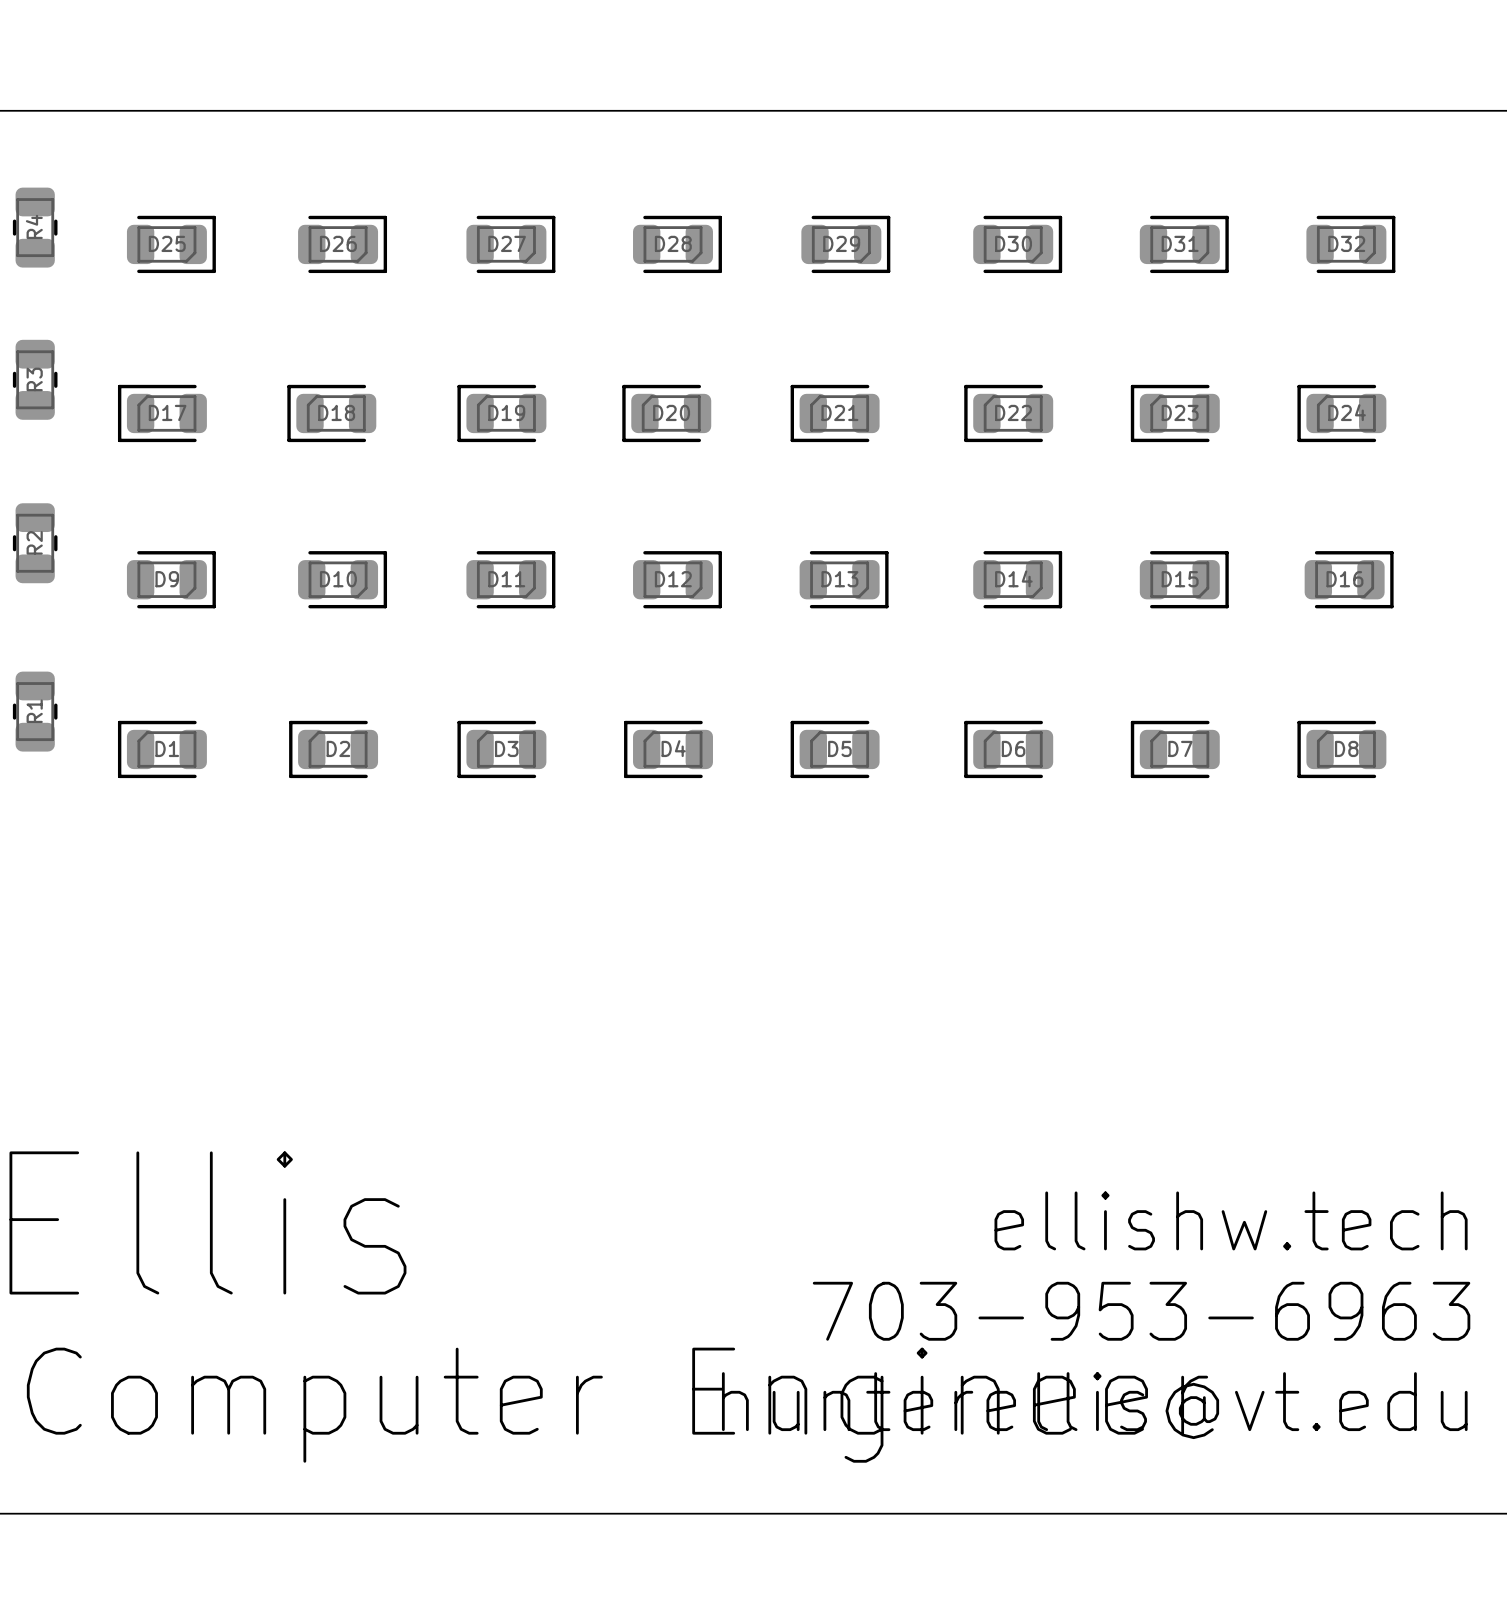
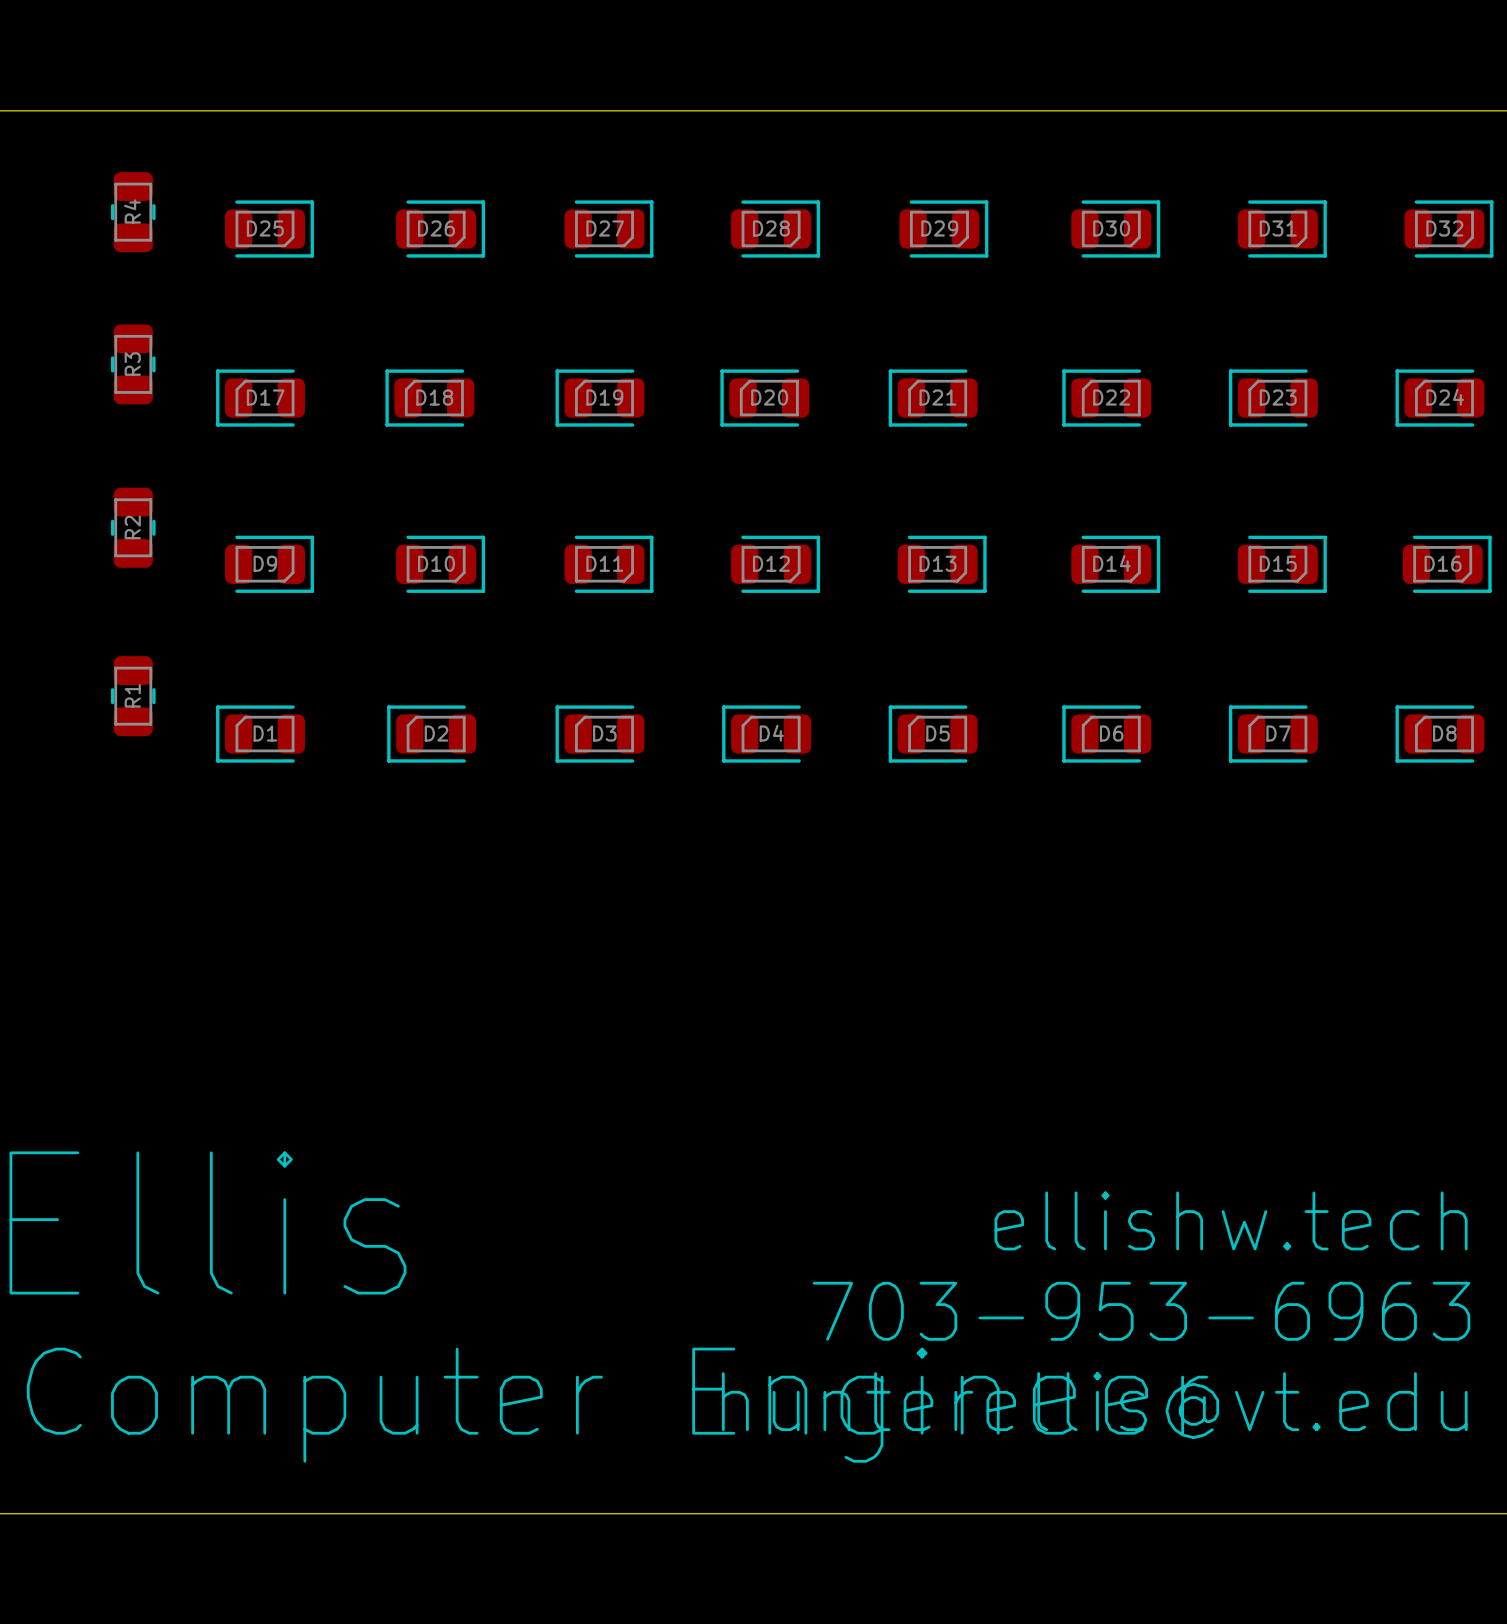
R4 position: (35, 227) -> (133, 212)
D25 position: (171, 244) -> (269, 228)
D26 position: (342, 244) -> (440, 228)
D27 position: (510, 244) -> (608, 228)
D28 position: (677, 244) -> (775, 228)
D29 position: (845, 244) -> (943, 228)
D30 position: (1017, 244) -> (1115, 228)
D31 position: (1184, 244) -> (1282, 228)
D32 position: (1350, 244) -> (1448, 228)
R3 position: (35, 379) -> (133, 364)
D17 position: (162, 413) -> (260, 398)
D18 position: (331, 413) -> (429, 398)
D19 position: (501, 413) -> (600, 398)
D20 position: (666, 413) -> (764, 398)
D21 position: (835, 413) -> (933, 398)
D22 position: (1008, 413) -> (1106, 398)
D23 position: (1175, 413) -> (1273, 398)
D24 position: (1341, 413) -> (1439, 398)
R2 position: (35, 543) -> (133, 527)
D9 position: (171, 579) -> (269, 564)
D10 position: (342, 579) -> (440, 564)
D11 position: (510, 579) -> (608, 564)
D12 position: (677, 579) -> (775, 564)
D13 position: (844, 579) -> (942, 564)
D14 position: (1017, 579) -> (1115, 564)
D15 position: (1184, 579) -> (1282, 564)
D16 position: (1349, 579) -> (1447, 564)
R1 position: (35, 711) -> (133, 696)
D1 position: (162, 749) -> (260, 734)
D2 position: (333, 749) -> (431, 734)
D3 position: (501, 749) -> (600, 734)
D4 position: (668, 749) -> (766, 734)
D5 position: (835, 749) -> (933, 734)
D6 position: (1008, 749) -> (1106, 734)
D7 position: (1175, 749) -> (1273, 734)
D8 position: (1341, 749) -> (1439, 734)

